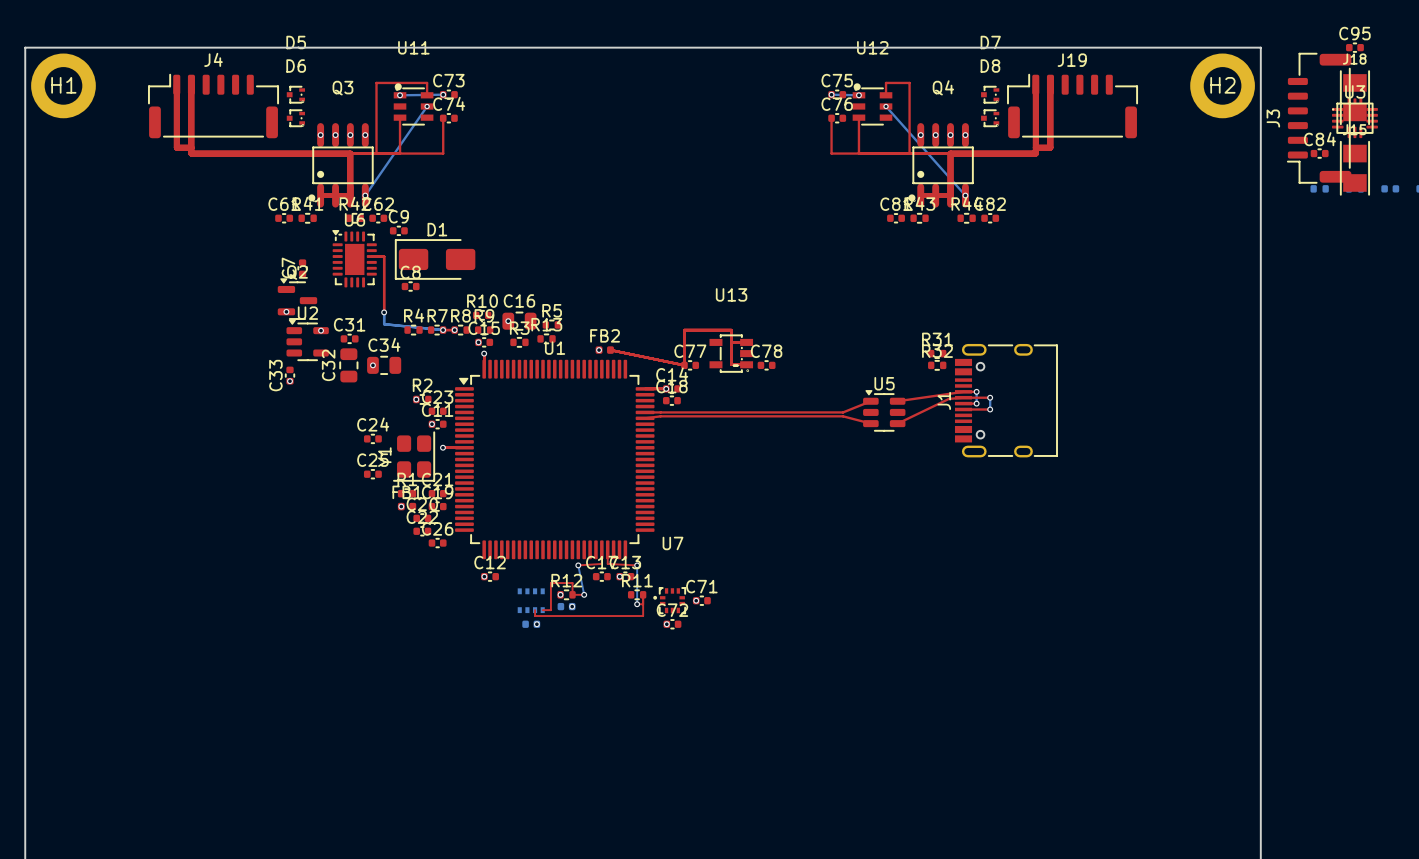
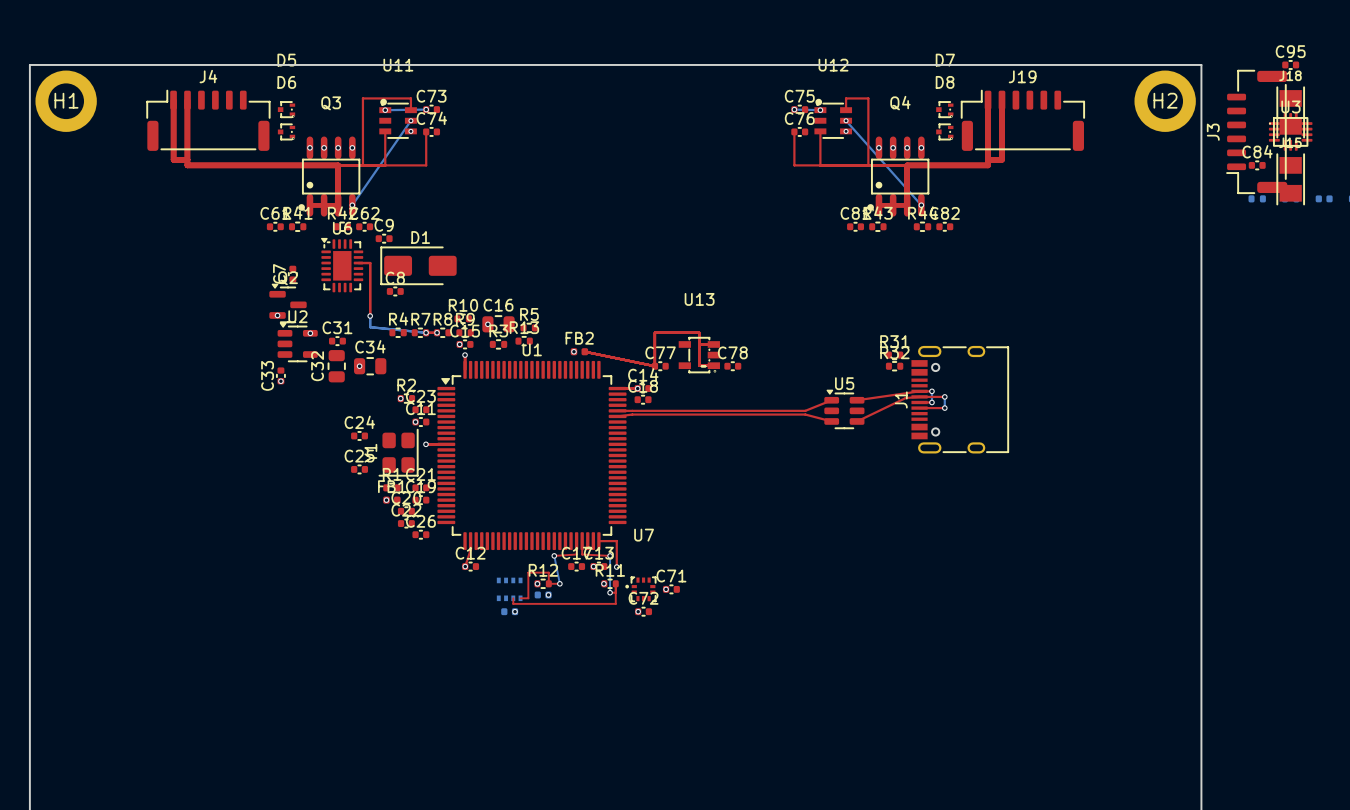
via: none -> (410, 131)
via: none -> (846, 131)
top track: none -> (470, 541) (470, 550) (465, 566)
top track: none -> (598, 541) (616, 541) (616, 567)
via: none -> (616, 567)
via: none -> (603, 583)

